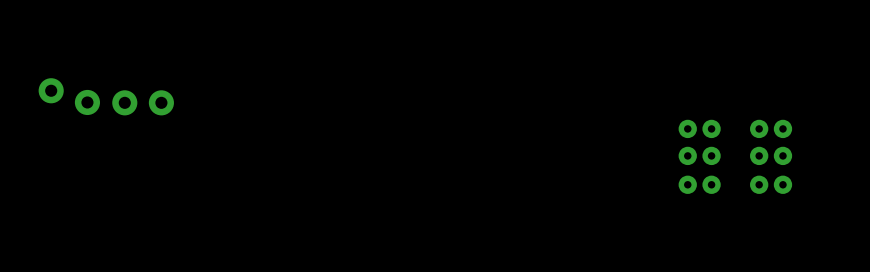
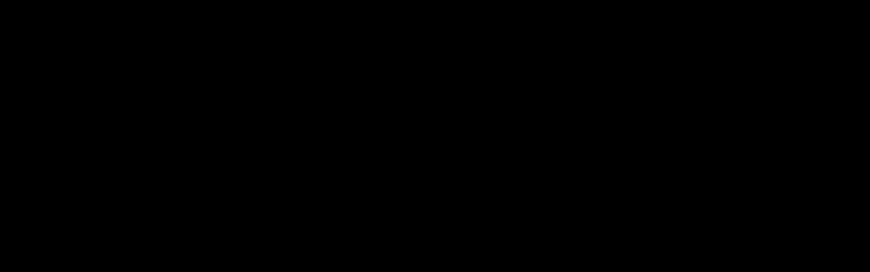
via: (51, 90) -> none
via: (87, 102) -> none
via: (124, 102) -> none
via: (161, 102) -> none
part: (735, 156) -> none

